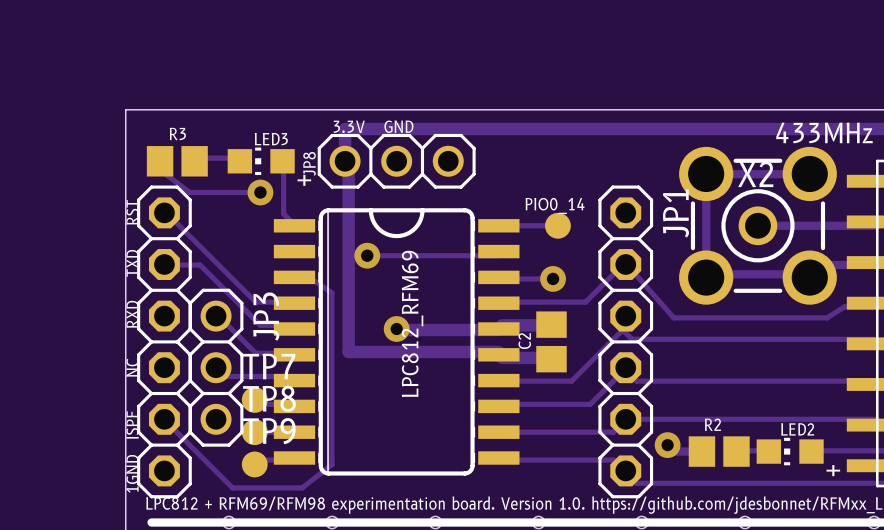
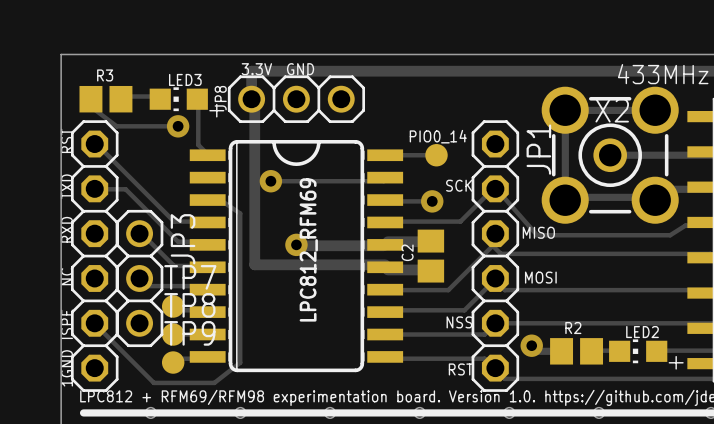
text: none -> SCK (459, 185)
text: none -> MISO (538, 232)
text: none -> MOSI (540, 277)
text: none -> NSS (459, 322)
text: none -> RST (460, 369)

